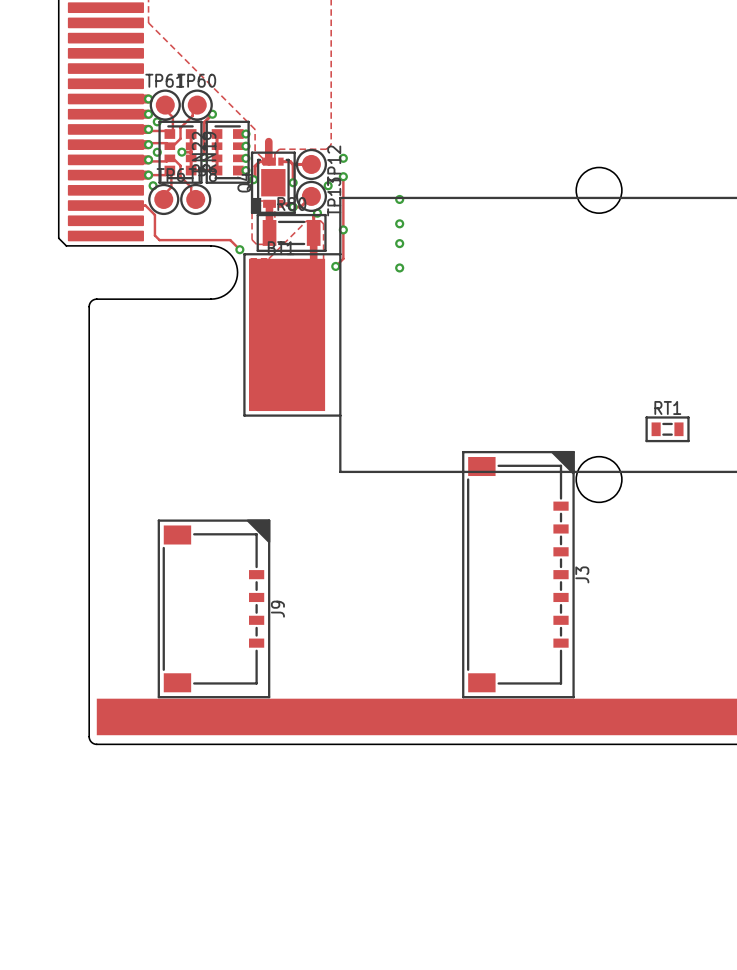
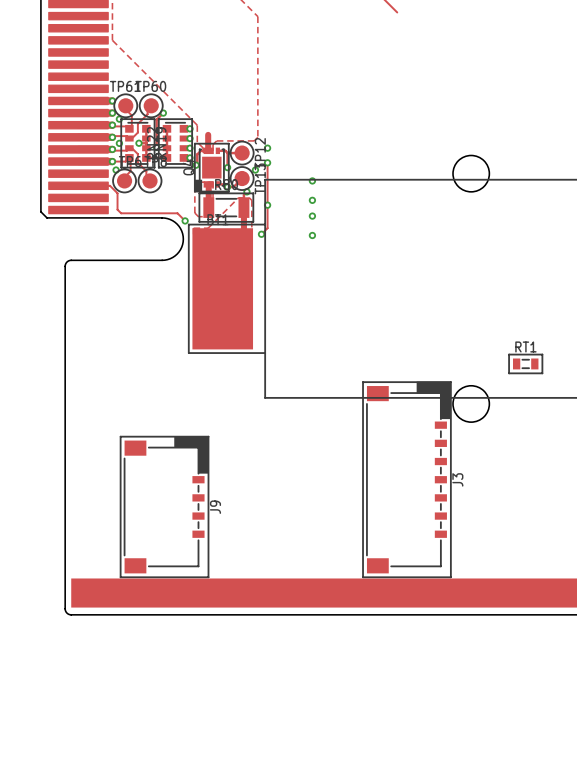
J3 footprint: [462, 450, 575, 699] -> [362, 381, 452, 579]
J9 footprint: [157, 519, 271, 699] -> [119, 435, 210, 579]

